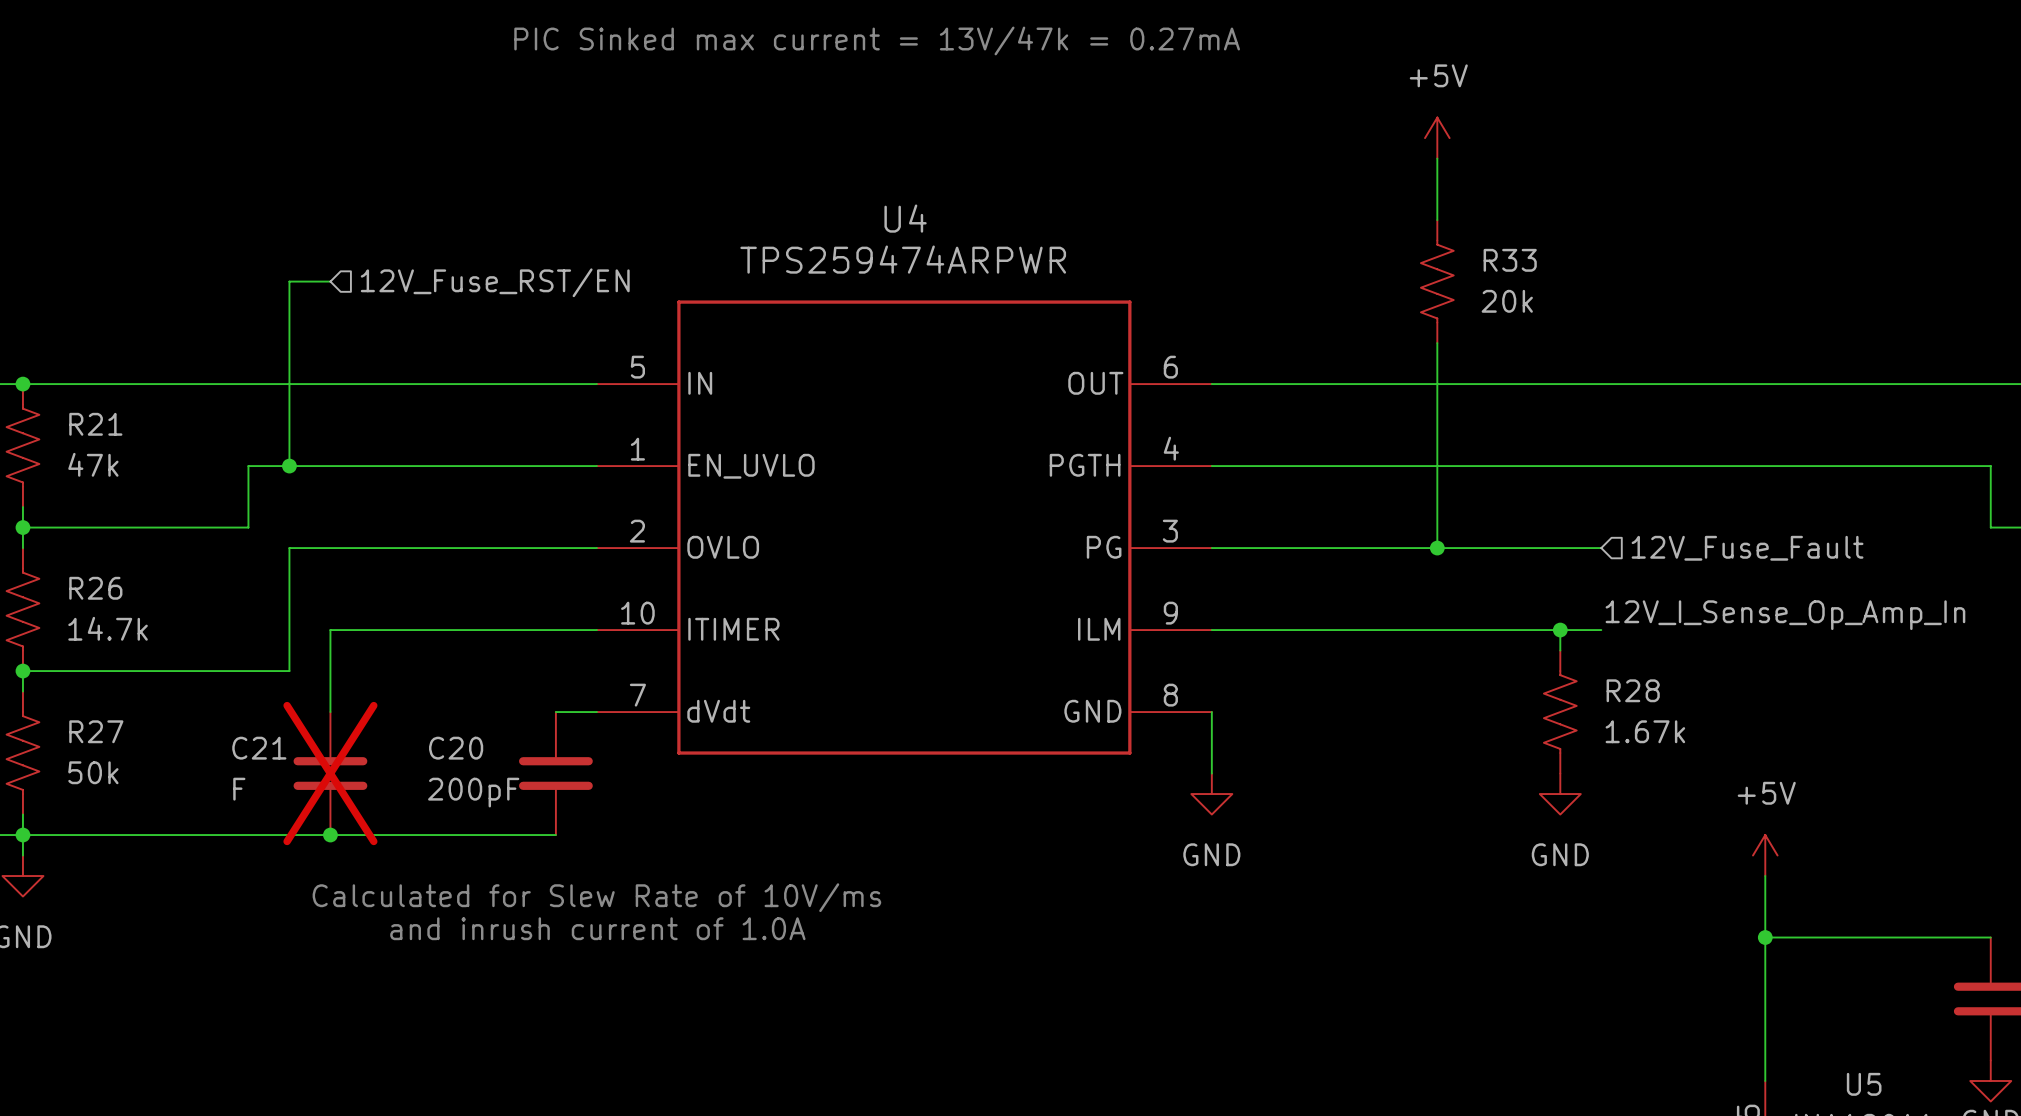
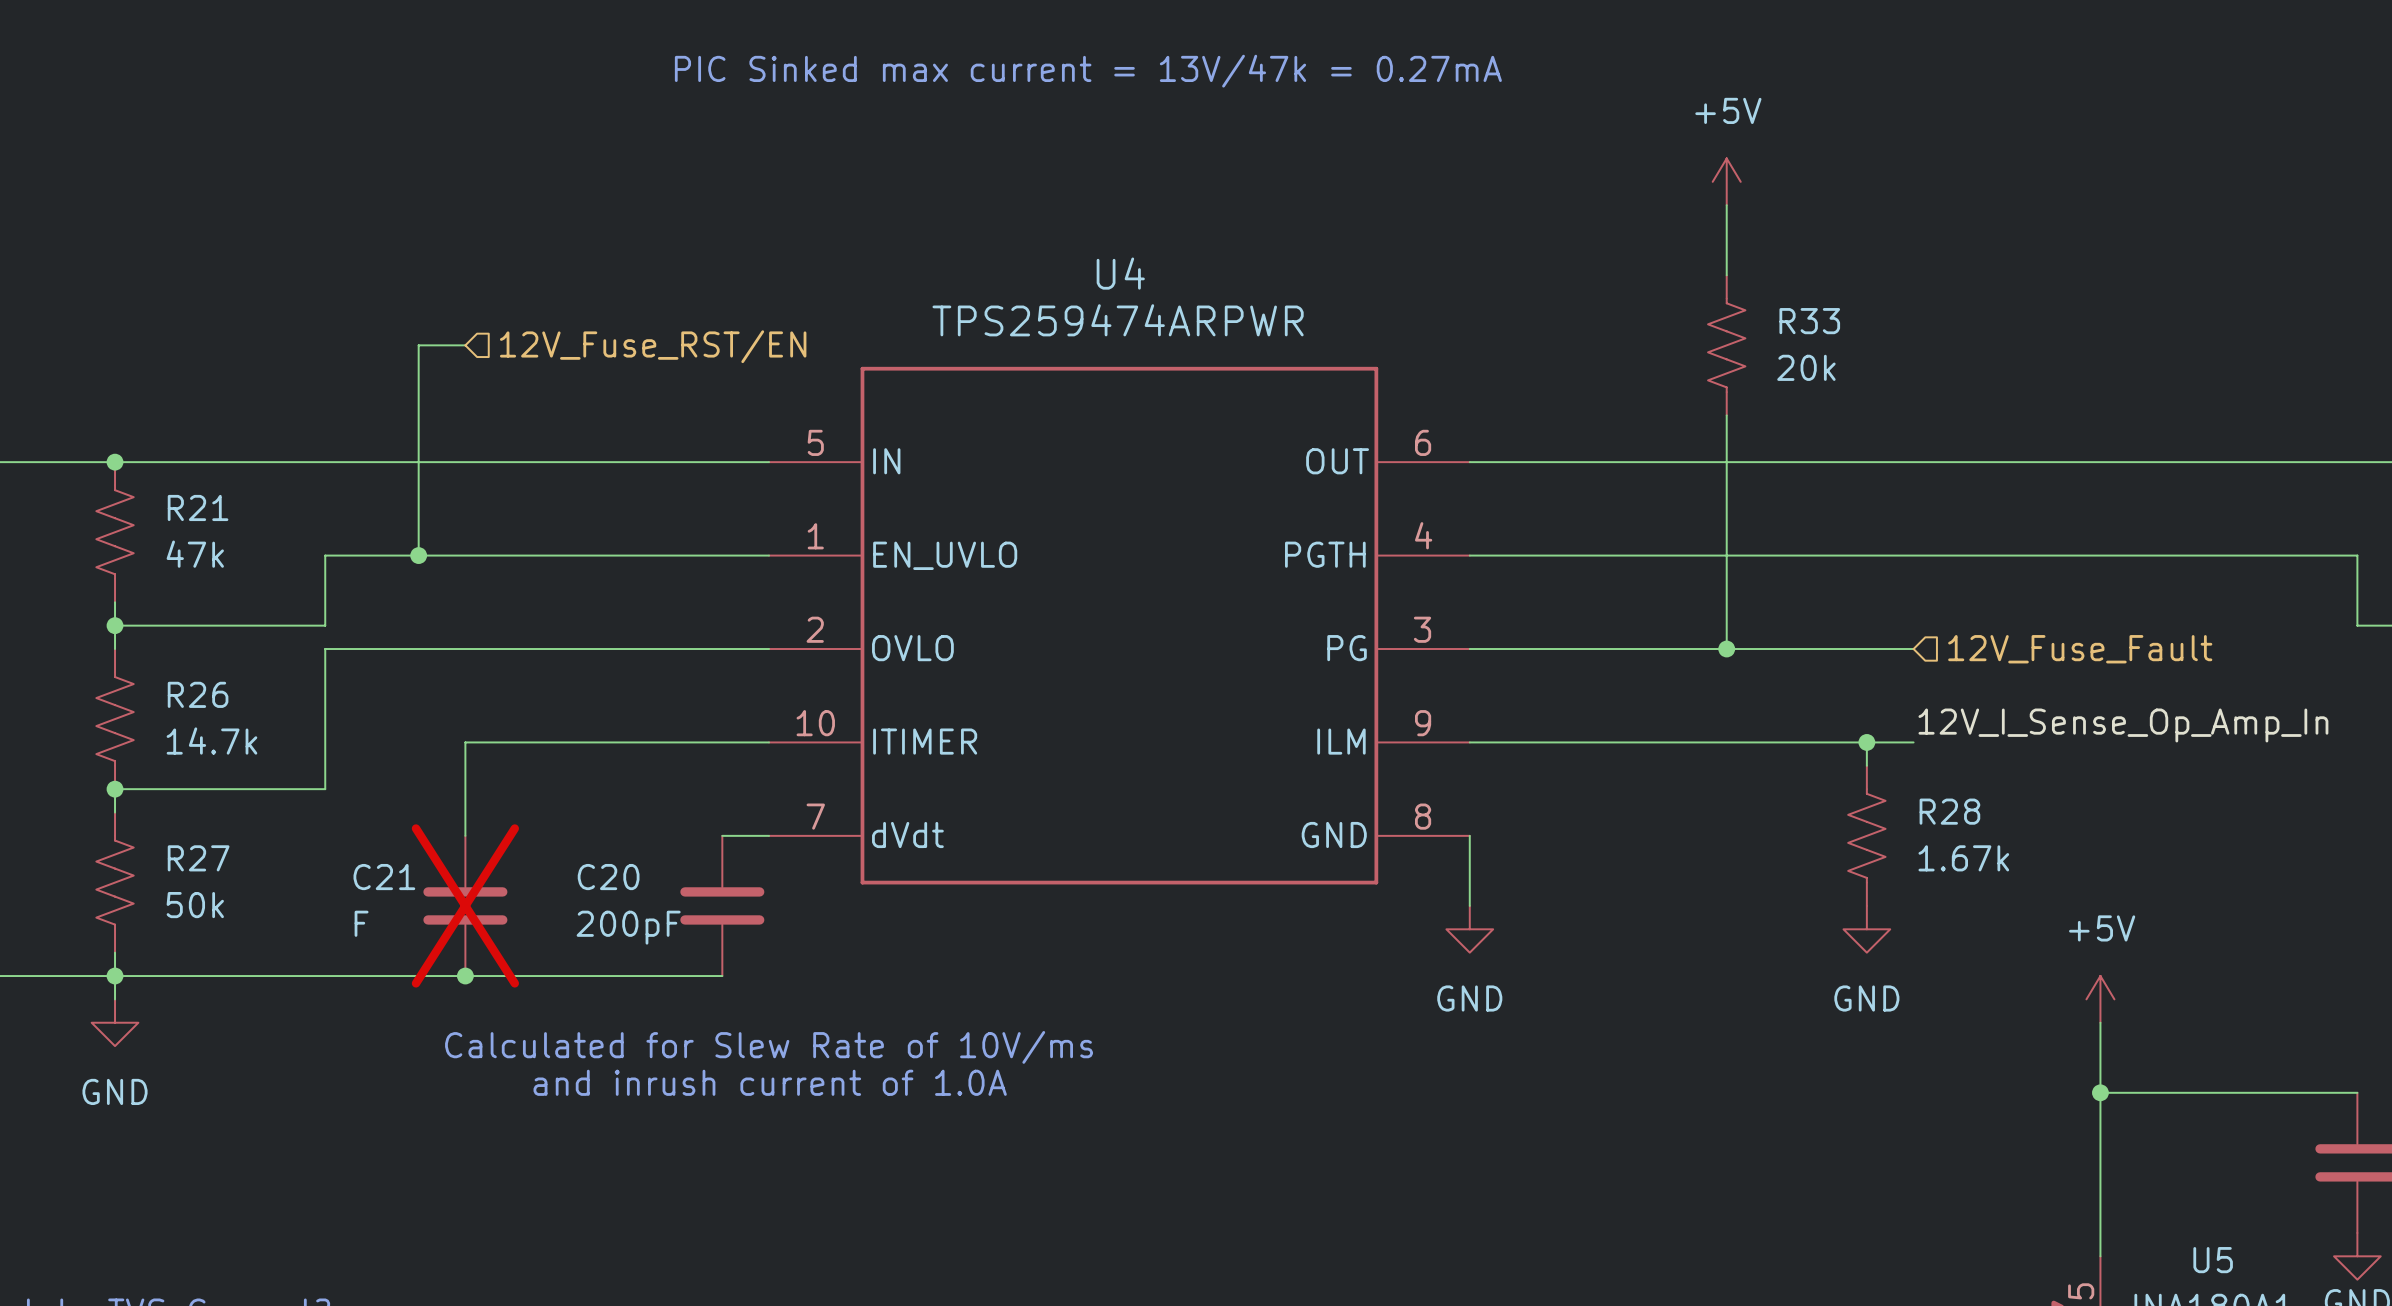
wire: (248, 466) (248, 527) (207, 527) -> (371, 555) (325, 555) (325, 625)
wire: (289, 548) (289, 671) (207, 671) -> (418, 649) (325, 649) (325, 789)

